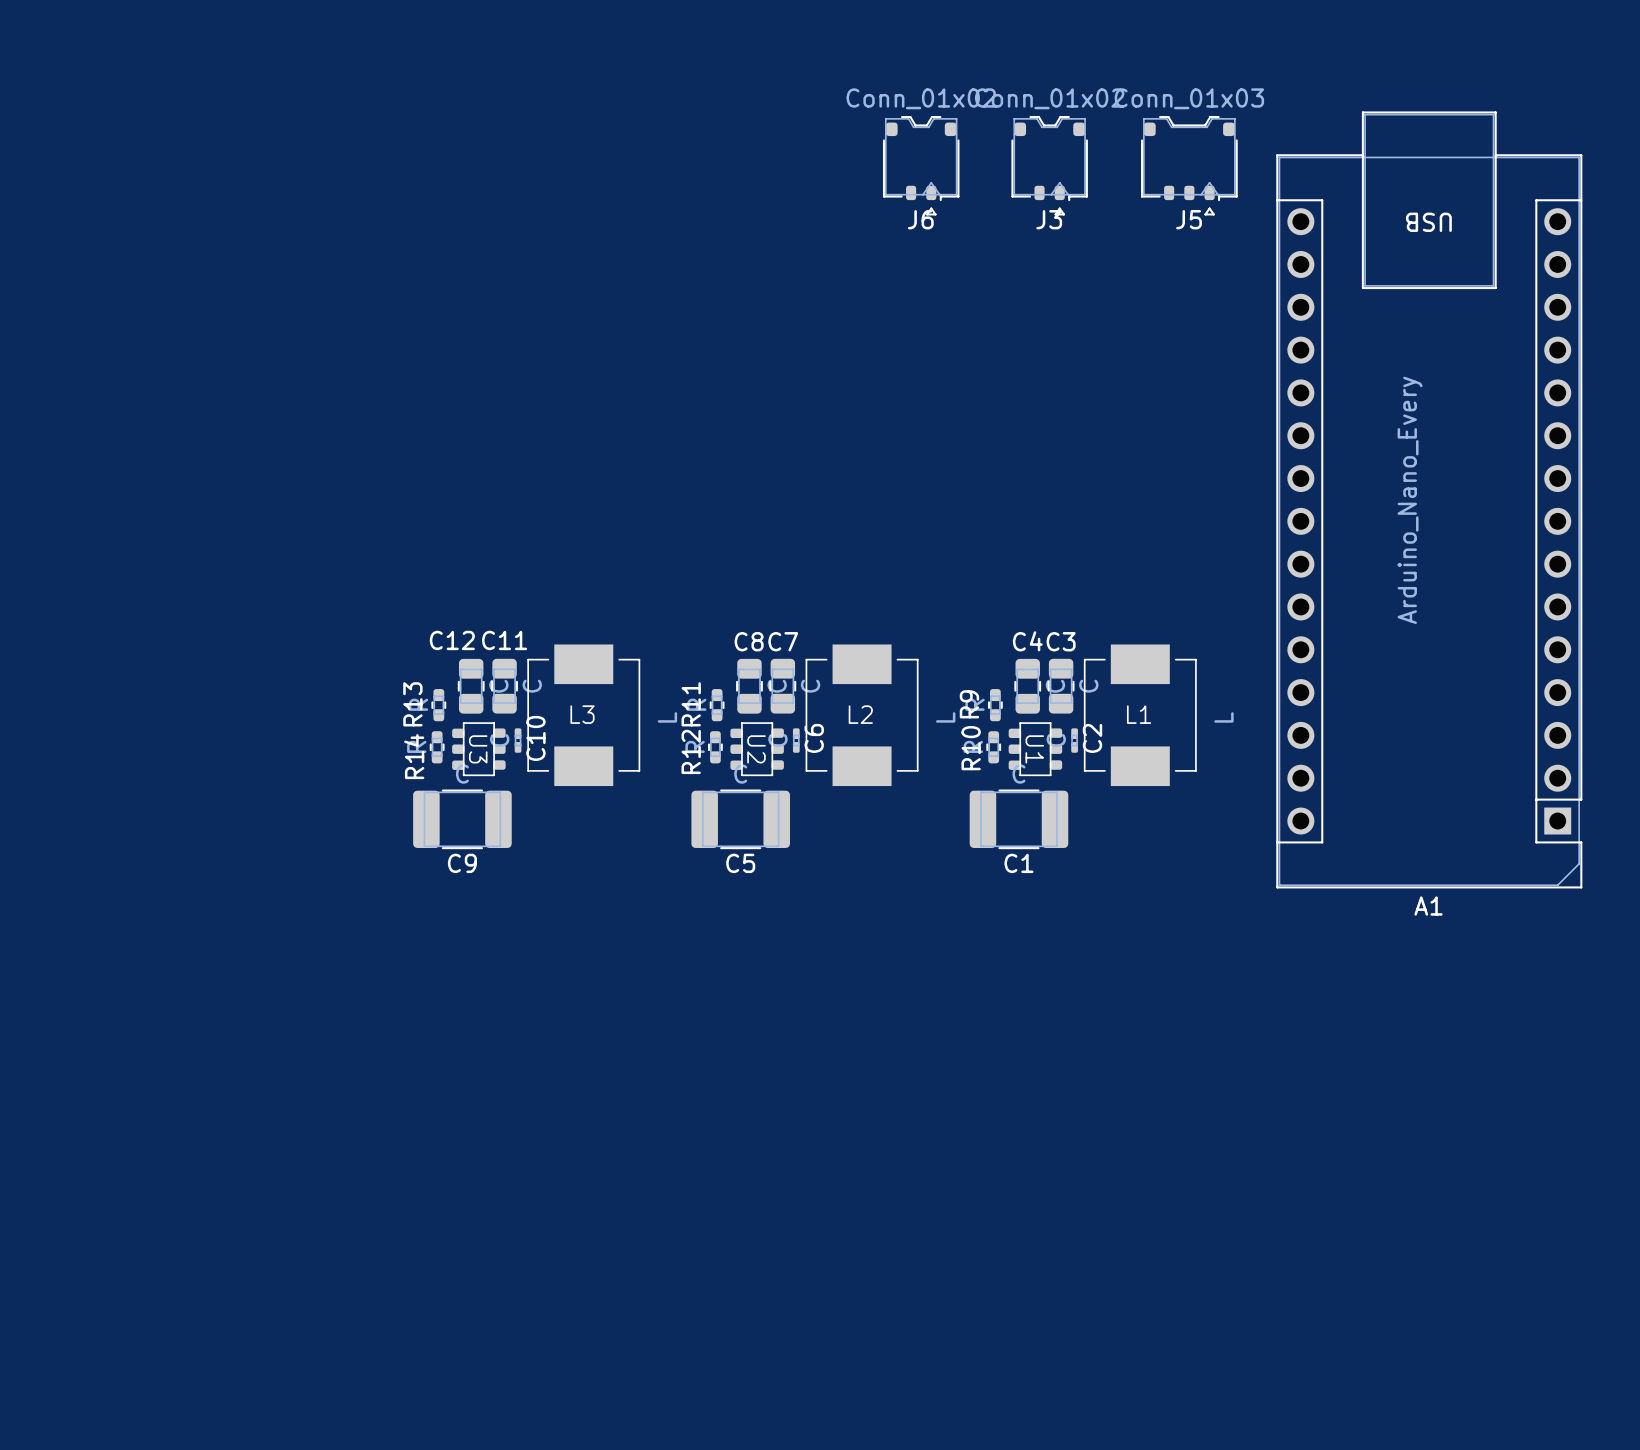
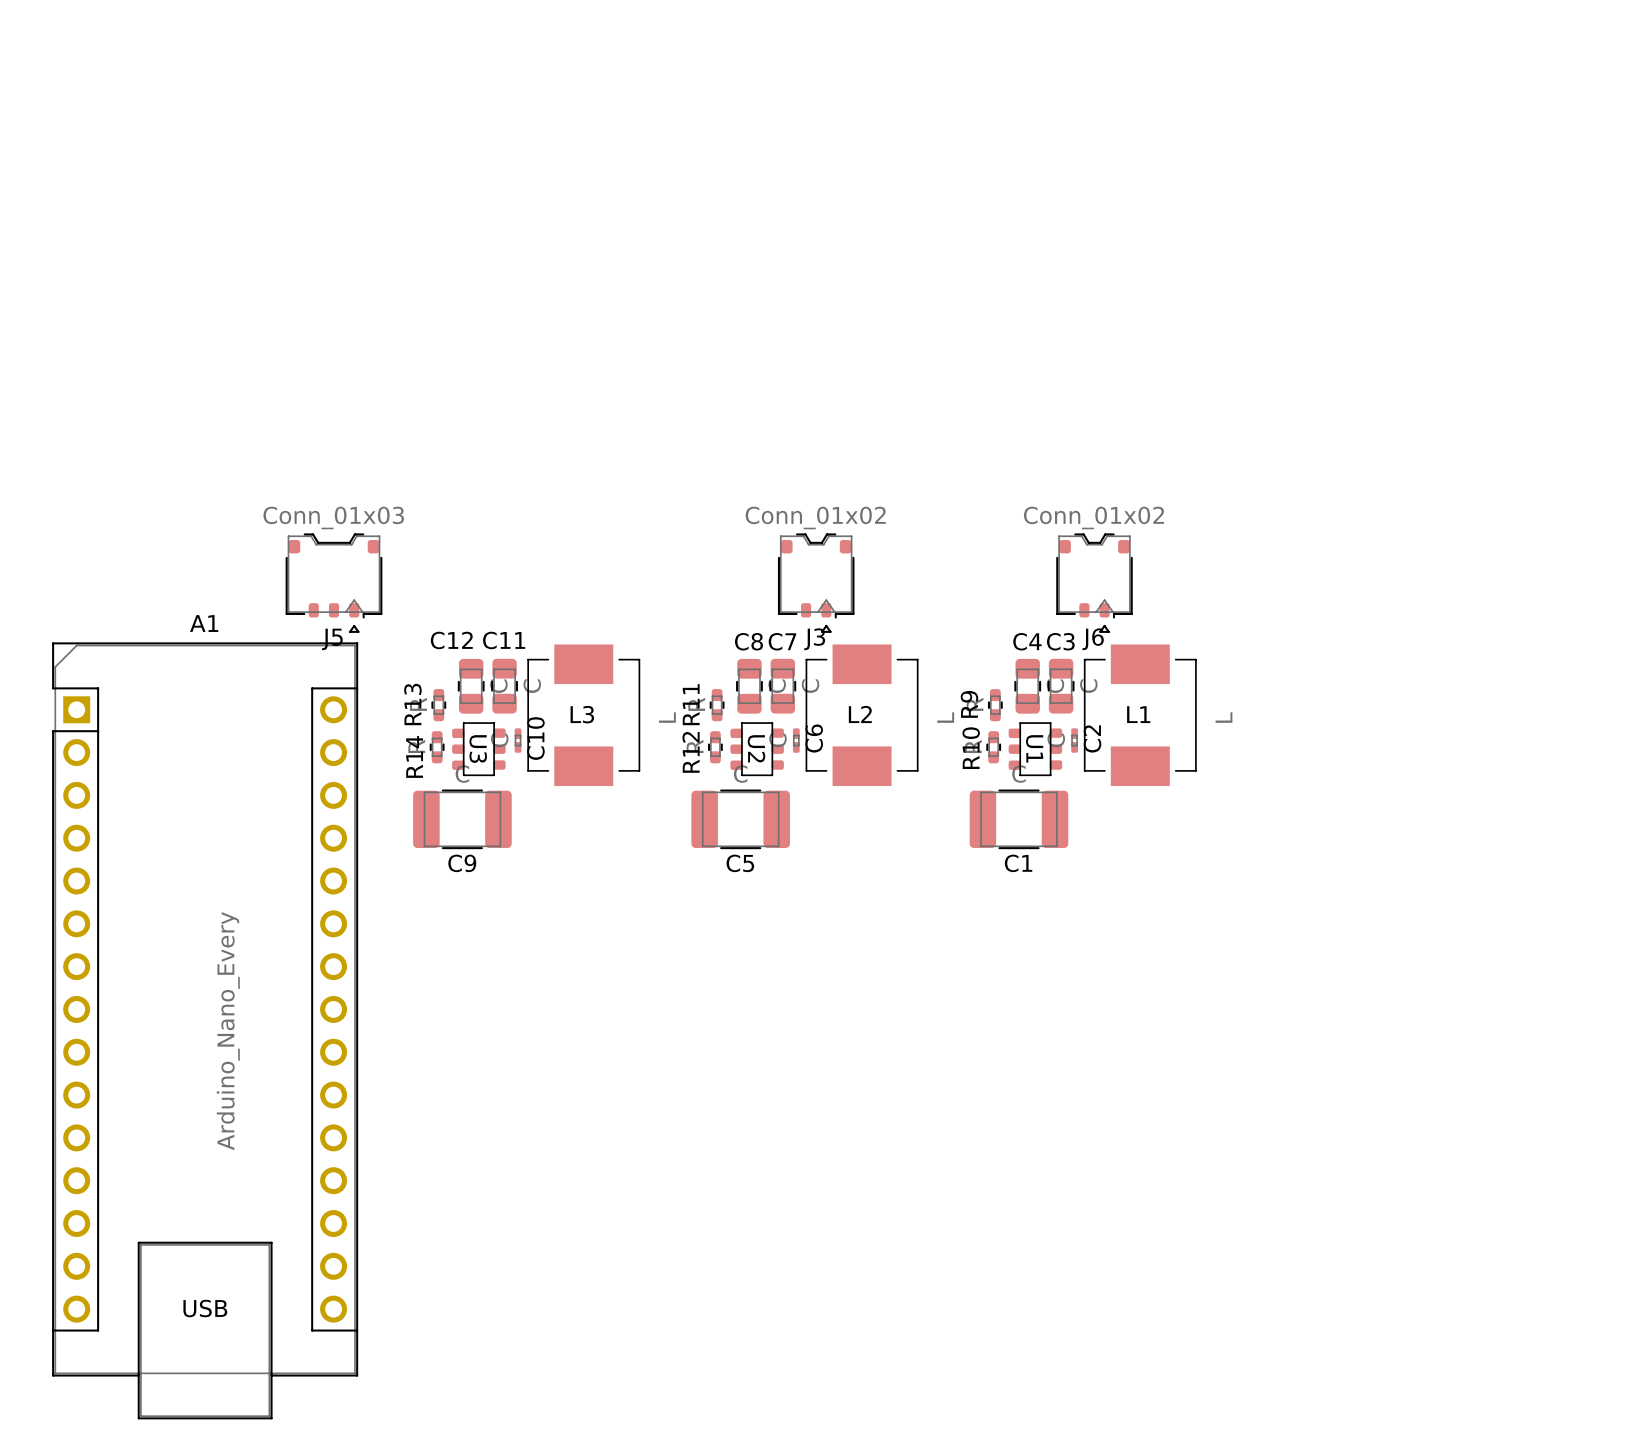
J6 position: (921, 165) -> (1094, 583)
J3 position: (1049, 165) -> (816, 583)
J5 position: (1189, 165) -> (333, 583)
A1 rotation: 0° (1429, 499) -> 180° (205, 1030)
A1 position: (1429, 499) -> (205, 1030)

